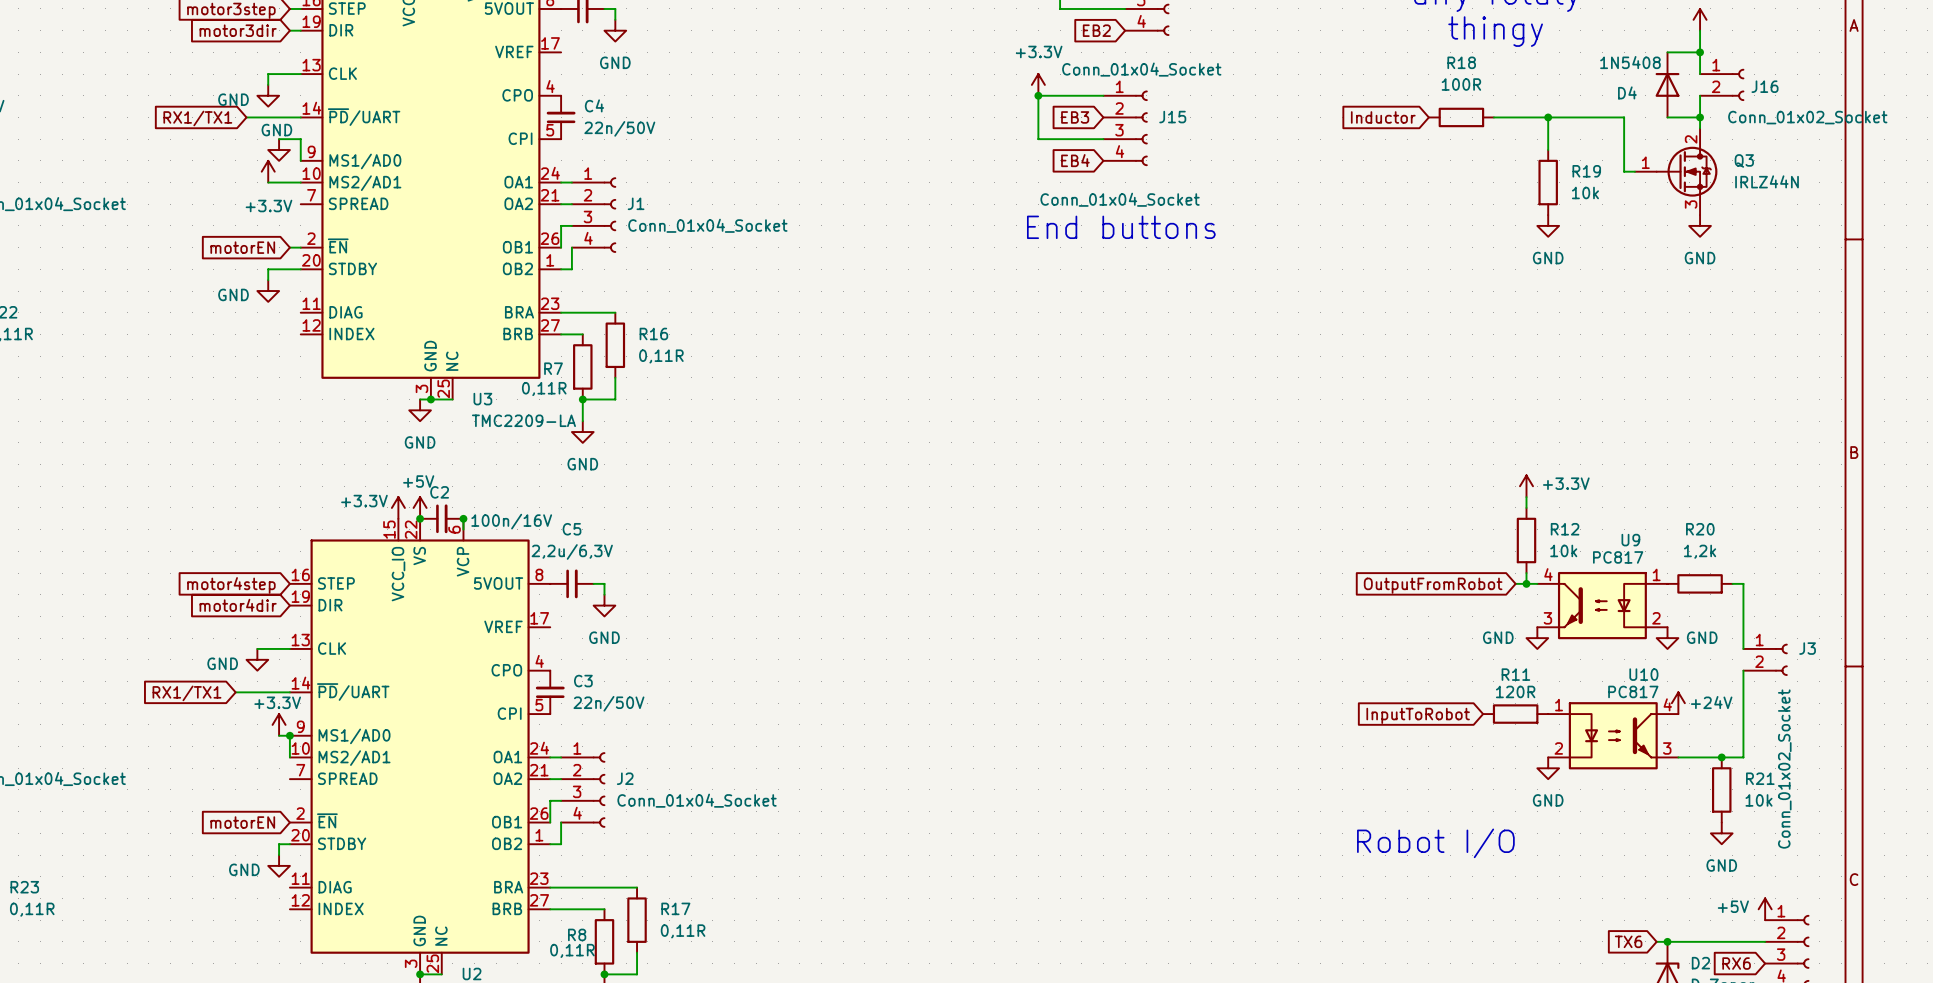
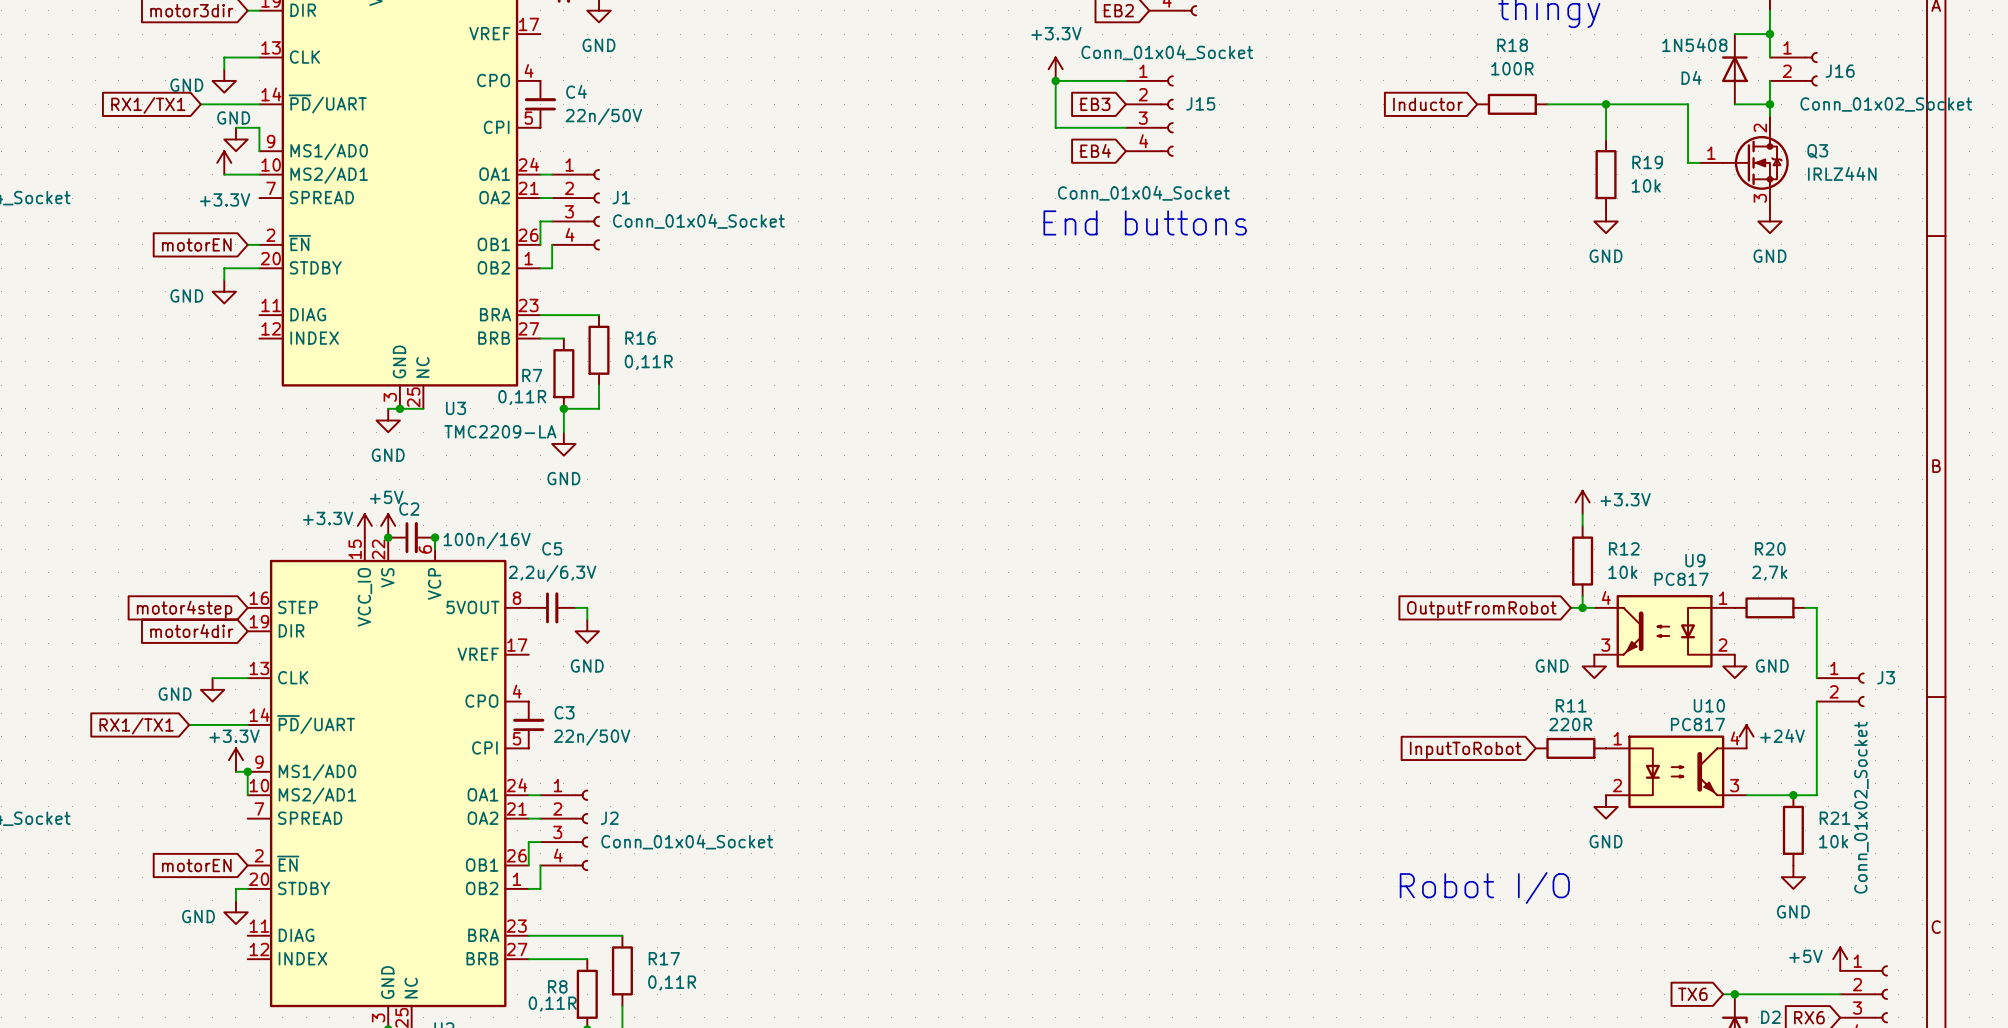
R20 value: 1,2k (1700, 551) -> 2,7k (1769, 573)
R11 value: 120R (1515, 691) -> 220R (1570, 724)

